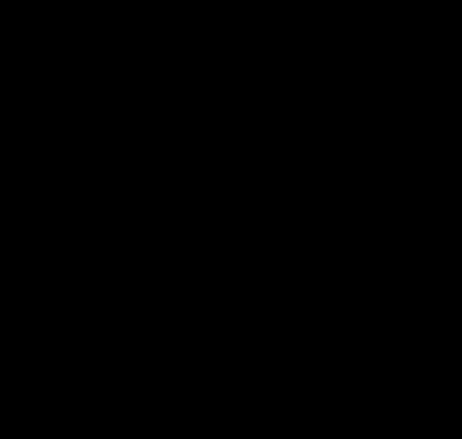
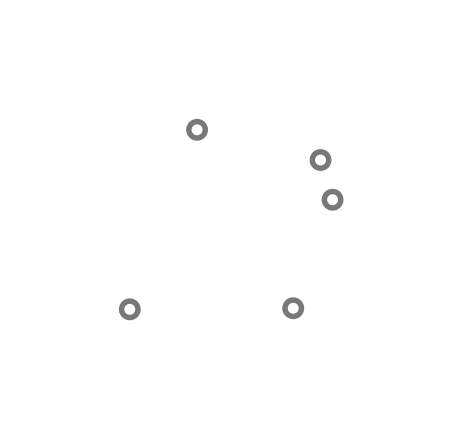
via: none -> (197, 129)
via: none -> (320, 160)
via: none -> (332, 199)
via: none -> (293, 308)
via: none -> (129, 309)

